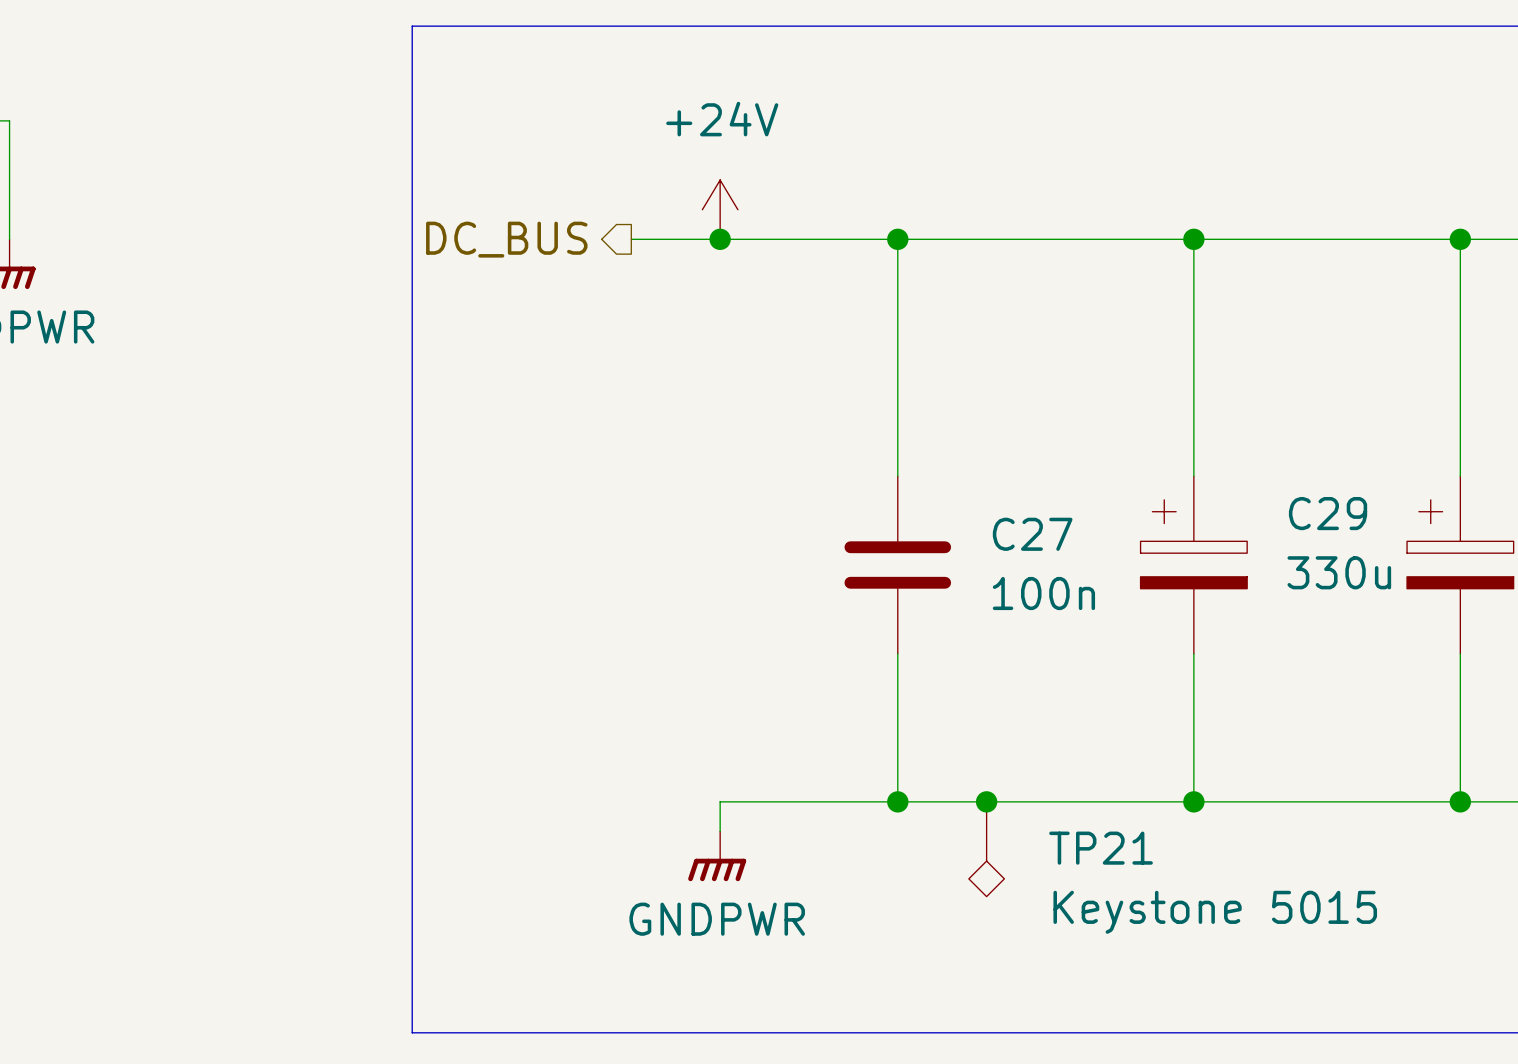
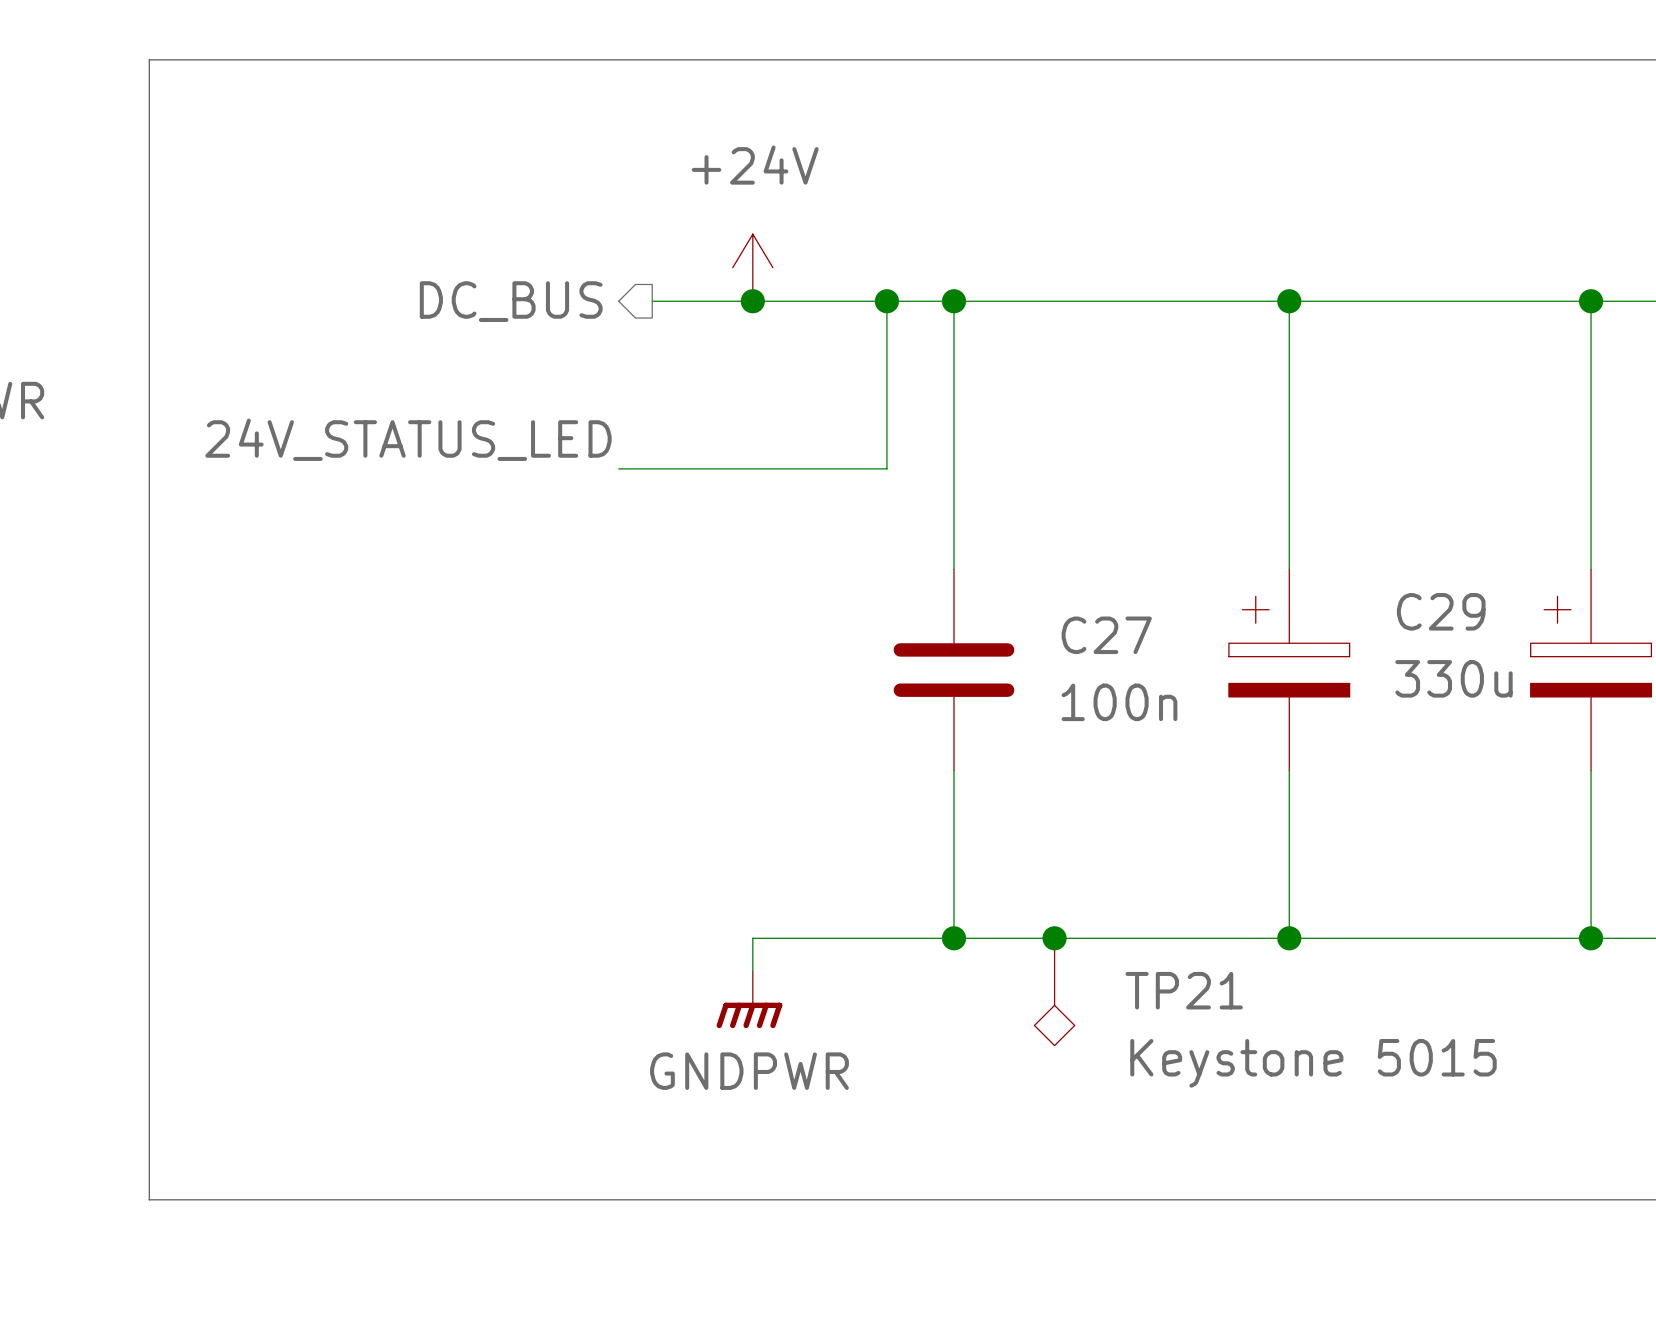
line: (412, 26) (412, 1032) -> (404, 59) (149, 59) (149, 1199) (404, 1199)
wire: none -> (886, 301) (886, 468) (618, 468)
junction: none -> (886, 301)
label: none -> 24V_STATUS_LED (408, 439)

